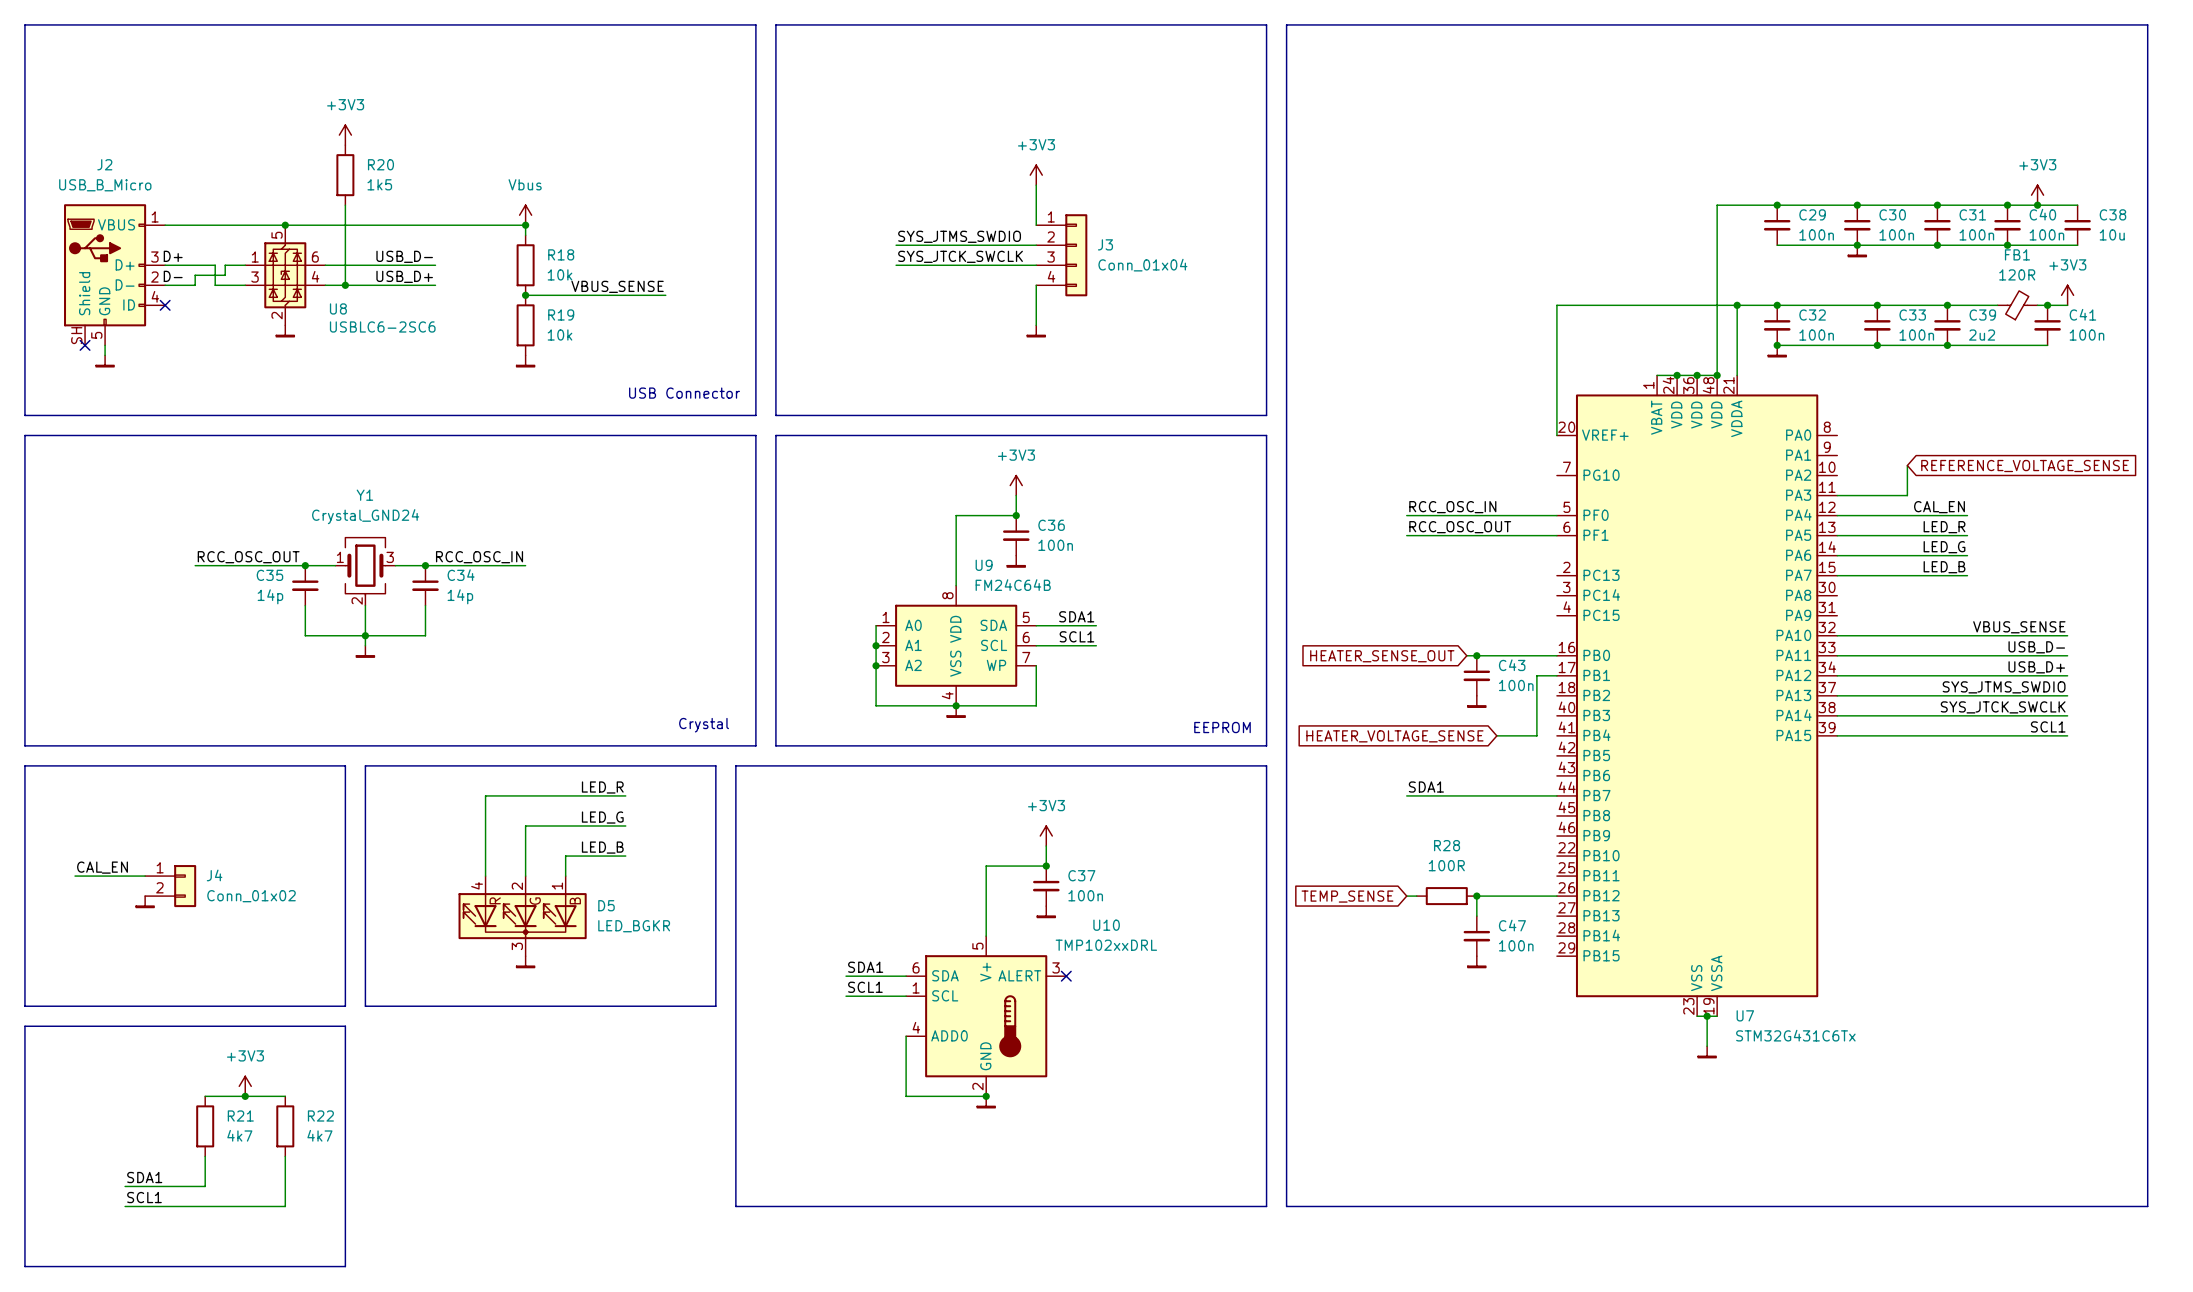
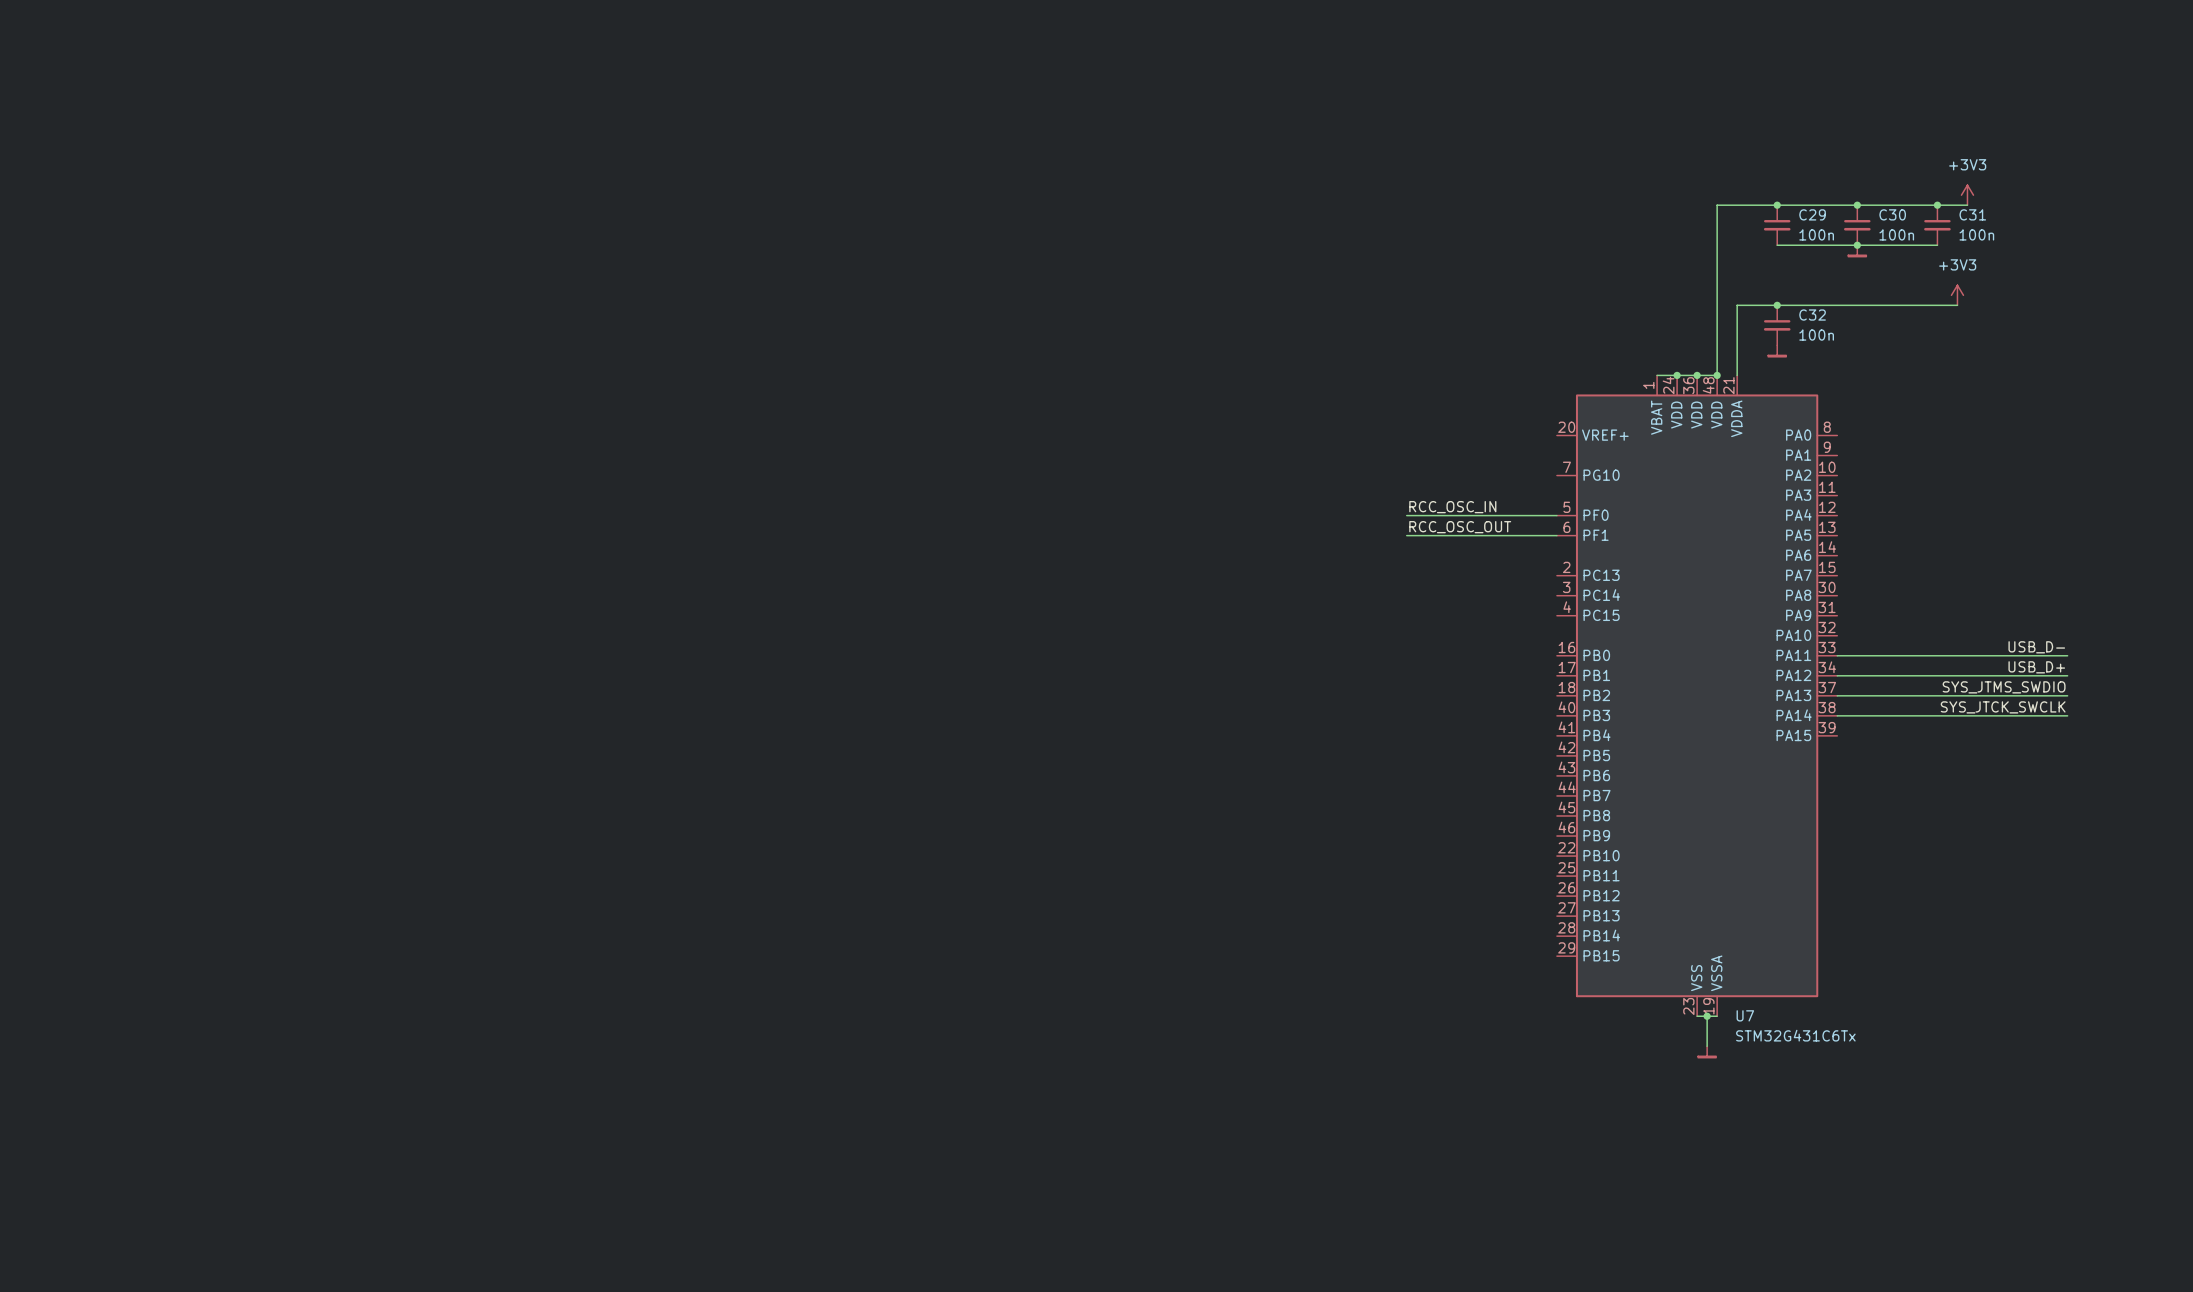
line: (24, 24) (24, 415) (755, 415) (755, 24) (24, 24) -> none
line: (775, 24) (775, 415) (1266, 415) (1266, 24) (775, 24) -> none
line: (1286, 24) (2147, 24) (2147, 1206) (1286, 1206) (1286, 24) -> none
power symbol: +3V3 (345, 135) -> none
R20: 1k5 (345, 175) -> none
power symbol: +3V3 (1036, 175) -> none
wire: (1036, 185) (1036, 225) -> none
power symbol: none -> +3V3 (1967, 195)
power symbol: +3V3 (2037, 195) -> none
wire: (345, 205) (345, 285) -> none
wire: (1967, 205) (2077, 205) -> none
junction: (2007, 205) -> none
junction: (2037, 205) -> none
power symbol: Vbus (525, 215) -> none
wire: (165, 225) (525, 225) (525, 235) -> none
junction: (285, 225) -> none
junction: (525, 225) -> none
C40: 100n (2007, 225) -> none
C38: 10u (2077, 225) -> none
label: SYS_JTMS_SWDIO (959, 236) -> none
wire: (896, 245) (1036, 245) -> none
wire: (1937, 245) (2077, 245) -> none
junction: (1937, 245) -> none
junction: (2007, 245) -> none
J3: Conn_01x04 (1061, 255) -> none
label: D+ (173, 256) -> none
label: USB_D- (404, 256) -> none
label: SYS_JTCK_SWCLK (960, 256) -> none
wire: (165, 265) (215, 265) (215, 285) (245, 285) -> none
wire: (245, 265) (225, 265) (225, 275) (195, 275) (195, 285) (165, 285) -> none
wire: (325, 265) (435, 265) -> none
R18: 10k (525, 265) -> none
wire: (896, 265) (1036, 265) -> none
J2: USB_B_Micro (114, 274) -> none
U8: USBLC6-2SC6 (285, 275) -> none
label: D- (173, 276) -> none
label: USB_D+ (404, 276) -> none
wire: (325, 285) (435, 285) -> none
junction: (345, 285) -> none
wire: (1036, 285) (1036, 325) -> none
label: VBUS_SENSE (617, 286) -> none
wire: (525, 295) (665, 295) -> none
junction: (525, 295) -> none
power symbol: none -> +3V3 (1957, 295)
power symbol: +3V3 (2067, 295) -> none
no-connect mark: (165, 305) -> none
wire: (1737, 305) (1556, 305) (1556, 435) -> none
junction: (1737, 305) -> none
junction: (1877, 305) -> none
junction: (1947, 305) -> none
wire: (1957, 305) (1997, 305) -> none
FB1: 120R (2017, 305) -> none
wire: (2037, 305) (2067, 305) -> none
junction: (2047, 305) -> none
R19: 10k (525, 325) -> none
C33: 100n (1877, 325) -> none
C39: 2u2 (1947, 325) -> none
C41: 100n (2047, 325) -> none
power symbol: (285, 331) -> none
power symbol: (1036, 331) -> none
no-connect mark: (85, 345) -> none
wire: (105, 345) (105, 355) -> none
wire: (1777, 345) (2047, 345) -> none
junction: (1777, 345) -> none
junction: (1877, 345) -> none
junction: (1947, 345) -> none
power symbol: (105, 361) -> none
power symbol: (525, 361) -> none
text: USB Connector (684, 393) -> none
line: (24, 435) (24, 745) (755, 745) (755, 435) (24, 435) -> none
line: (775, 435) (1266, 435) (1266, 745) (775, 745) (775, 435) -> none
wire: (1907, 465) (1907, 495) (1837, 495) -> none
global label: REFERENCE_VOLTAGE_SENSE (2025, 466) -> none
power symbol: +3V3 (1016, 485) -> none
wire: (1016, 495) (1016, 515) (956, 515) (956, 585) -> none
label: CAL_EN (1939, 507) -> none
junction: (1016, 515) -> none
wire: (1837, 515) (1967, 515) -> none
label: LED_R (1944, 527) -> none
C36: 100n (1016, 535) -> none
wire: (1837, 535) (1967, 535) -> none
label: LED_G (1944, 547) -> none
wire: (1837, 555) (1967, 555) -> none
label: RCC_OSC_OUT (248, 557) -> none
label: RCC_OSC_IN (479, 557) -> none
power symbol: (1016, 561) -> none
wire: (195, 565) (335, 565) -> none
junction: (305, 565) -> none
wire: (395, 565) (525, 565) -> none
junction: (425, 565) -> none
label: LED_B (1944, 567) -> none
Y1: Crystal_GND24 (365, 571) -> none
wire: (1837, 575) (1967, 575) -> none
C35: 14p (305, 585) -> none
C34: 14p (425, 585) -> none
wire: (305, 605) (305, 635) (425, 635) (425, 605) -> none
wire: (365, 605) (365, 645) -> none
label: SDA1 (1076, 616) -> none
wire: (876, 625) (876, 705) (1036, 705) (1036, 665) -> none
wire: (1036, 625) (1096, 625) -> none
label: VBUS_SENSE (2019, 627) -> none
junction: (365, 635) -> none
wire: (1837, 635) (2067, 635) -> none
label: SCL1 (1076, 636) -> none
junction: (876, 645) -> none
U9: FM24C64B (956, 645) -> none
wire: (1036, 645) (1096, 645) -> none
power symbol: (365, 651) -> none
wire: (1466, 655) (1556, 655) -> none
junction: (1476, 655) -> none
global label: HEATER_SENSE_OUT (1382, 656) -> none
junction: (876, 665) -> none
C43: 100n (1476, 675) -> none
wire: (1556, 675) (1536, 675) (1536, 735) (1496, 735) -> none
power symbol: (1476, 701) -> none
junction: (956, 705) -> none
power symbol: (956, 711) -> none
text: Crystal (704, 725) -> none
label: SCL1 (2048, 726) -> none
text: EEPROM (1222, 727) -> none
wire: (1837, 735) (2067, 735) -> none
global label: HEATER_VOLTAGE_SENSE (1394, 736) -> none
line: (24, 765) (345, 765) (345, 1006) (24, 1006) (24, 765) -> none
line: (365, 765) (715, 765) (715, 1006) (365, 1006) (365, 765) -> none
line: (735, 765) (1266, 765) (1266, 1206) (735, 1206) (735, 765) -> none
label: LED_R (602, 787) -> none
label: SDA1 (1426, 787) -> none
wire: (625, 795) (485, 795) (485, 876) -> none
wire: (1406, 795) (1556, 795) -> none
label: LED_G (602, 817) -> none
wire: (625, 825) (525, 825) (525, 876) -> none
power symbol: +3V3 (1046, 836) -> none
wire: (1046, 846) (1046, 866) (986, 866) (986, 936) -> none
label: LED_B (602, 847) -> none
wire: (625, 856) (565, 856) (565, 876) -> none
junction: (1046, 866) -> none
label: CAL_EN (102, 867) -> none
wire: (75, 876) (145, 876) -> none
J4: Conn_01x02 (170, 886) -> none
C37: 100n (1046, 886) -> none
global label: TEMP_SENSE (1347, 896) -> none
wire: (1406, 896) (1416, 896) -> none
R28: 100R (1446, 896) -> none
junction: (1476, 896) -> none
wire: (1556, 896) (1476, 896) (1476, 916) -> none
power symbol: (145, 901) -> none
power symbol: (1046, 911) -> none
D5: LED_BGKR (522, 916) -> none
C47: 100n (1476, 936) -> none
power symbol: (525, 961) -> none
power symbol: (1476, 961) -> none
label: SDA1 (865, 967) -> none
wire: (846, 976) (906, 976) -> none
no-connect mark: (1066, 976) -> none
label: SCL1 (865, 987) -> none
wire: (846, 996) (906, 996) -> none
U10: TMP102xxDRL (986, 1016) -> none
line: (24, 1026) (24, 1266) (345, 1266) (345, 1026) (24, 1026) -> none
wire: (906, 1036) (906, 1096) (986, 1096) -> none
power symbol: +3V3 (245, 1086) -> none
wire: (205, 1096) (285, 1096) -> none
junction: (245, 1096) -> none
junction: (986, 1096) -> none
power symbol: (986, 1102) -> none
R21: 4k7 (205, 1126) -> none
R22: 4k7 (285, 1126) -> none
wire: (205, 1156) (205, 1186) (125, 1186) -> none
wire: (285, 1156) (285, 1206) (125, 1206) -> none
label: SDA1 (144, 1177) -> none
label: SCL1 (144, 1197) -> none

